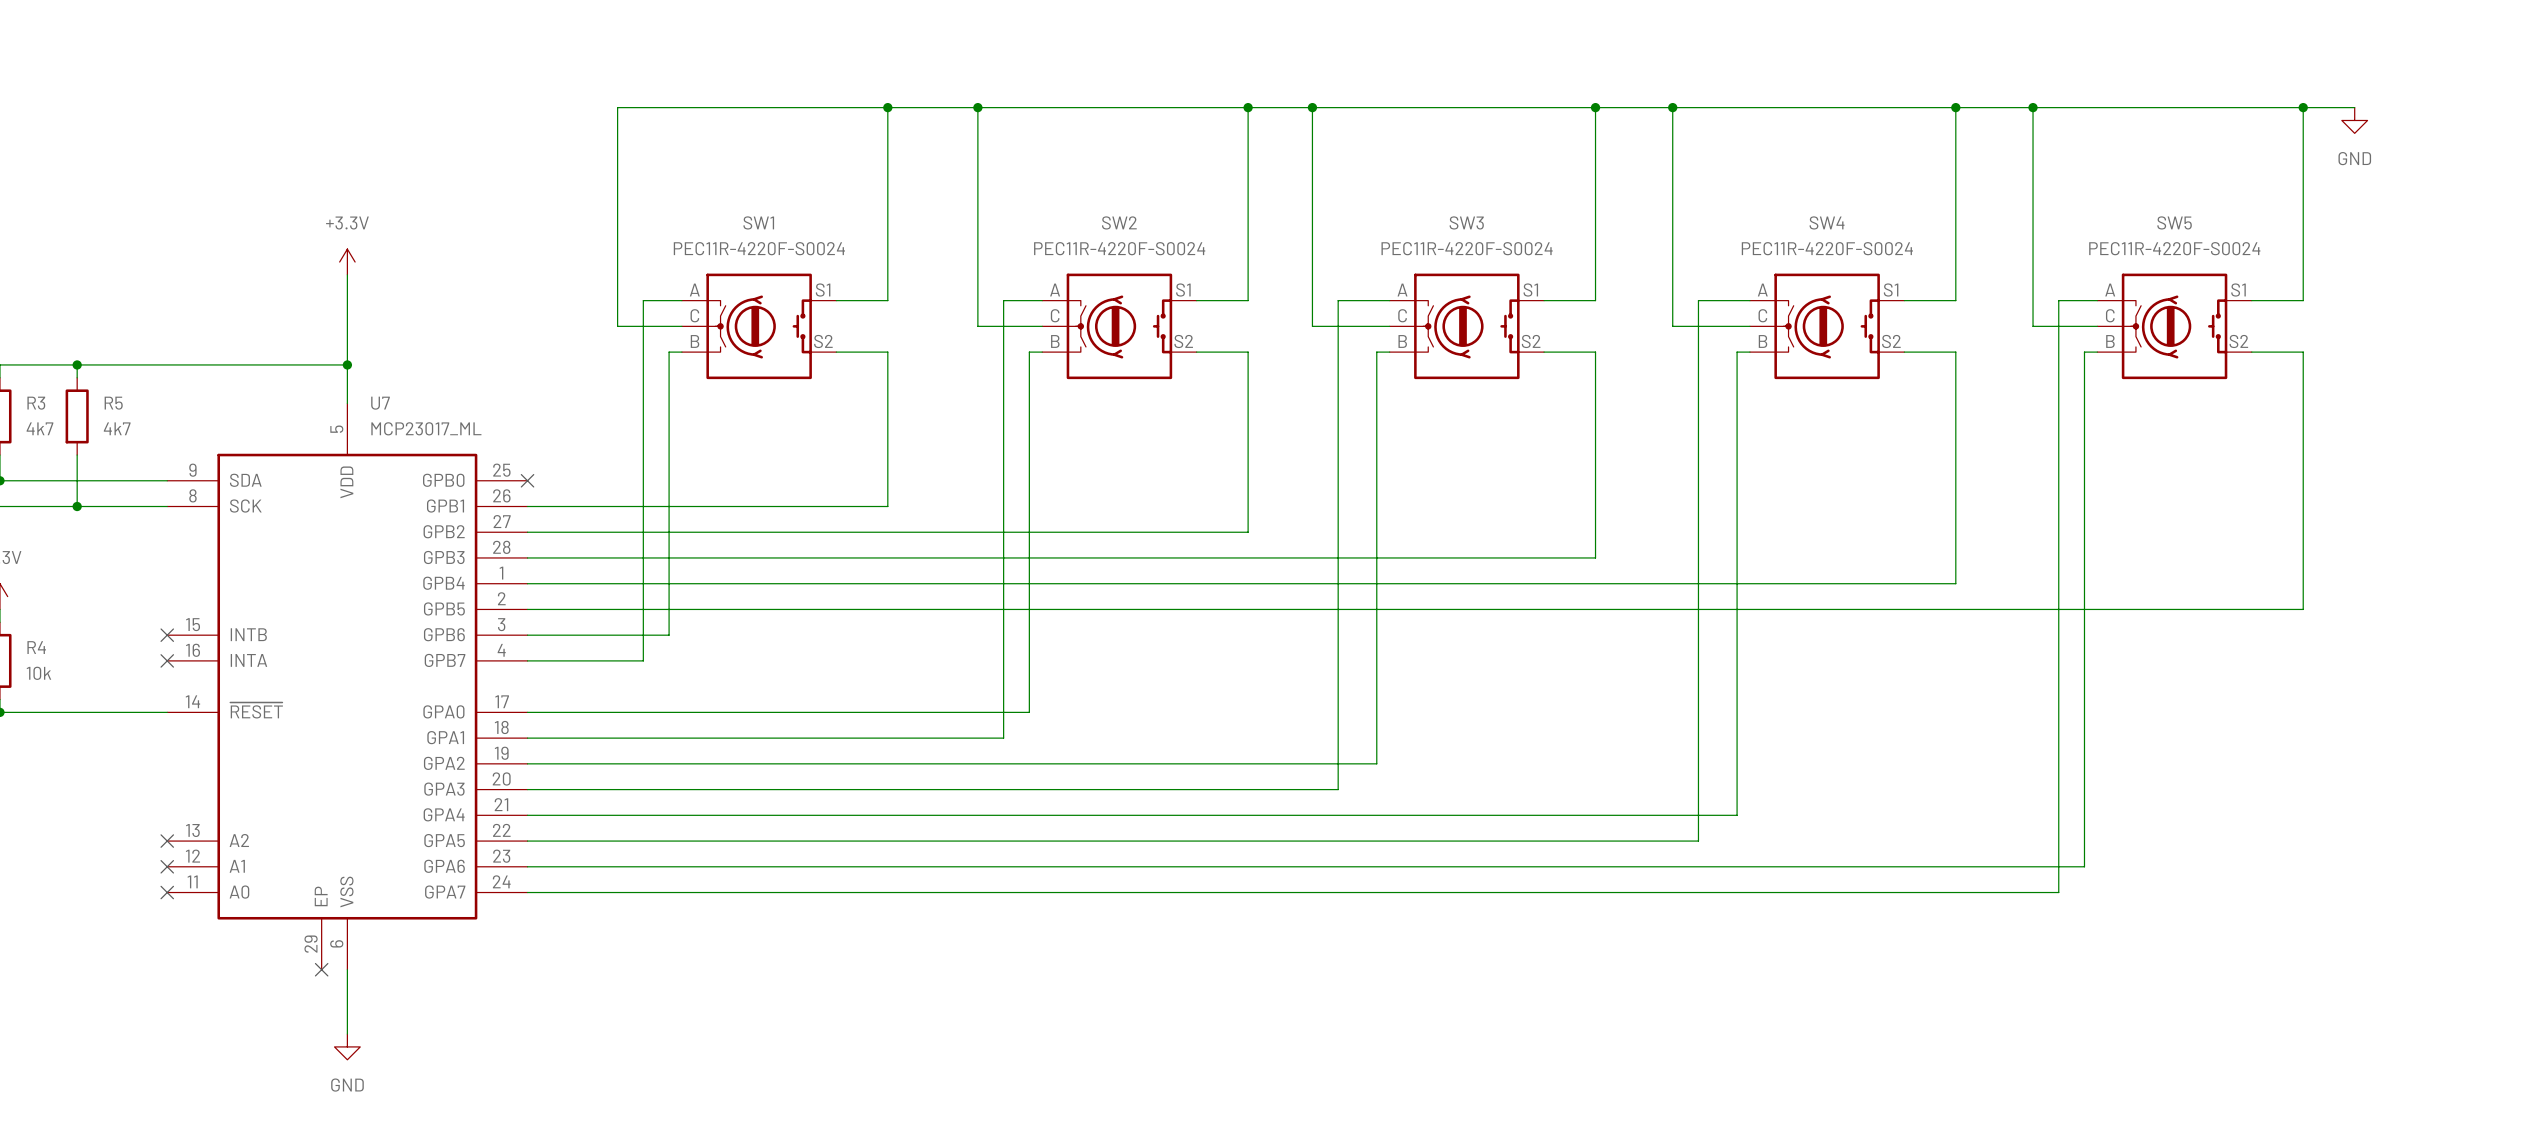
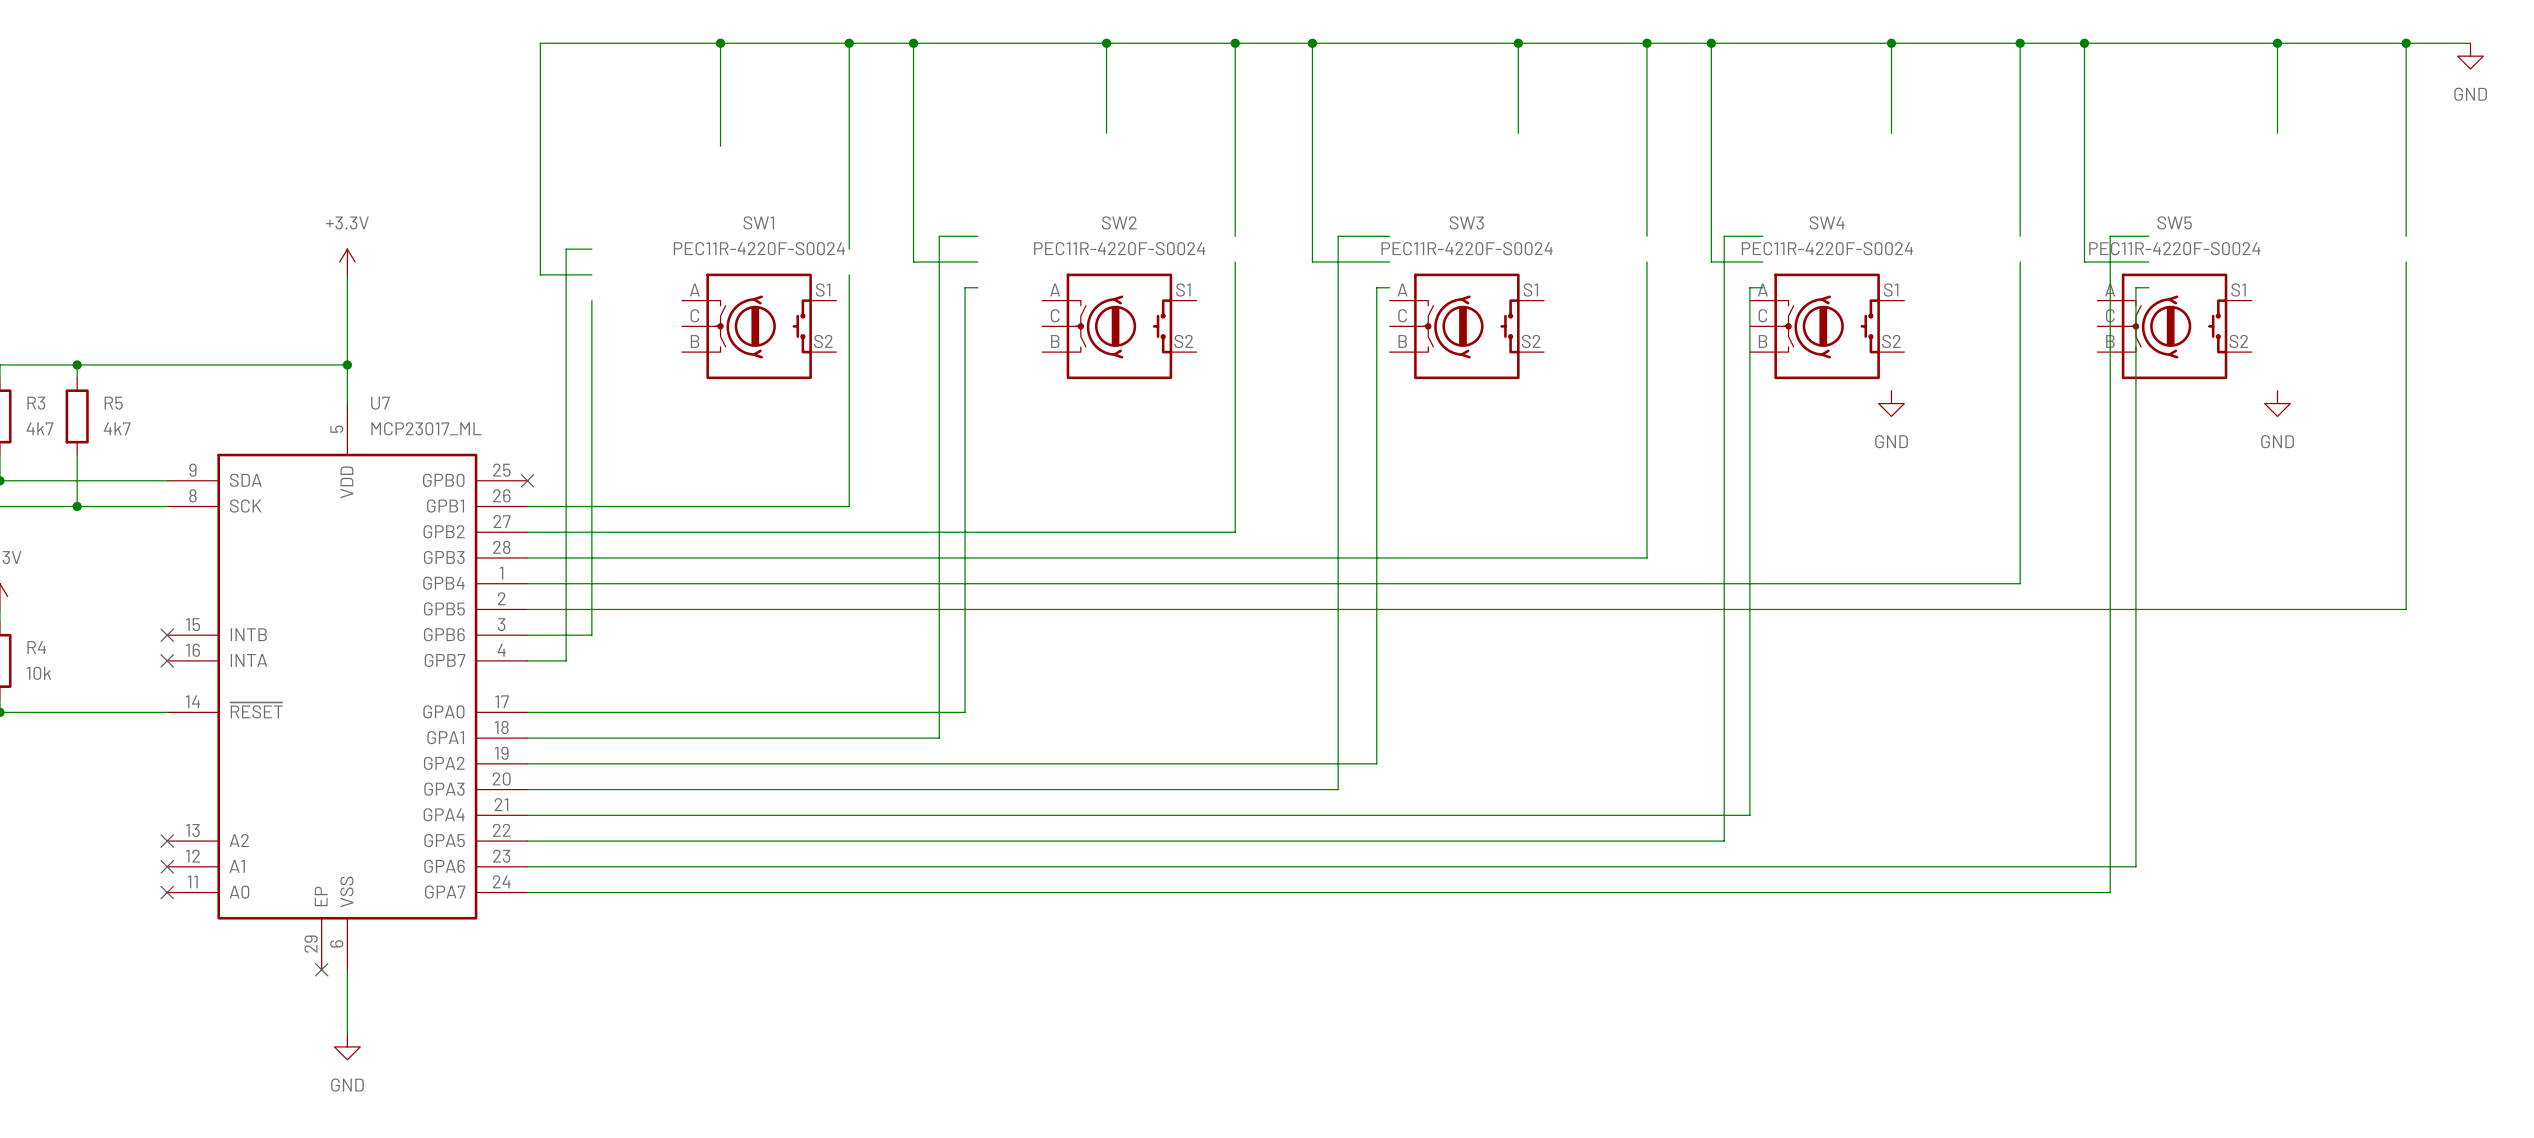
wire: none -> (720, 43) (720, 146)
junction: none -> (720, 43)
wire: none -> (849, 43) (849, 249)
junction: none -> (849, 43)
junction: none -> (913, 43)
wire: none -> (1106, 43) (1106, 133)
junction: none -> (1106, 43)
wire: none -> (1235, 43) (1235, 236)
junction: none -> (1235, 43)
wire: none -> (1312, 43) (1312, 107)
junction: none -> (1312, 43)
wire: none -> (1518, 43) (1518, 133)
junction: none -> (1518, 43)
wire: none -> (1646, 43) (1646, 236)
junction: none -> (1646, 43)
wire: none -> (1711, 43) (1711, 262) (1762, 262)
junction: none -> (1711, 43)
wire: none -> (1891, 43) (1891, 133)
junction: none -> (1891, 43)
wire: none -> (2020, 43) (2020, 236)
junction: none -> (2020, 43)
junction: none -> (2084, 43)
wire: none -> (2277, 43) (2277, 133)
junction: none -> (2277, 43)
wire: none -> (2406, 43) (2406, 236)
junction: none -> (2406, 43)
wire: none -> (2470, 43) (540, 43) (540, 274) (591, 274)
wire: (887, 107) (887, 300) (836, 300) -> none
junction: (887, 107) -> none
wire: (977, 107) (977, 326) (1042, 326) -> (913, 43) (913, 262) (977, 262)
junction: (977, 107) -> none
wire: (1248, 107) (1248, 300) (1196, 300) -> none
junction: (1248, 107) -> none
junction: (1312, 107) -> none
wire: (1595, 107) (1595, 300) (1544, 300) -> none
junction: (1595, 107) -> none
wire: (1672, 107) (1672, 326) (1749, 326) -> none
junction: (1672, 107) -> none
wire: (1955, 107) (1955, 300) (1904, 300) -> none
junction: (1955, 107) -> none
wire: (2033, 107) (2033, 326) (2097, 326) -> (2084, 43) (2084, 262) (2148, 262)
junction: (2033, 107) -> none
wire: (2303, 107) (2303, 300) (2251, 300) -> none
junction: (2303, 107) -> none
wire: (2354, 107) (617, 107) (617, 326) (681, 326) -> none
power symbol position: GND (2354, 120) -> GND (2470, 56)
wire: (1312, 262) (1312, 326) (1389, 326) -> (1312, 262) (1389, 262)
wire: (681, 300) (643, 300) (643, 660) (566, 660) -> (591, 249) (566, 249) (566, 660)
wire: (1042, 300) (1003, 300) (1003, 738) (939, 738) -> (977, 236) (939, 236) (939, 738)
wire: (1338, 300) (1389, 300) -> (1338, 300) (1338, 236) (1389, 236)
wire: (1749, 300) (1698, 300) (1698, 841) -> (1762, 236) (1724, 236) (1724, 841) (1698, 841)
wire: (2097, 300) (2058, 300) (2058, 892) -> (2148, 236) (2110, 236) (2110, 892) (2058, 892)
wire: (681, 352) (669, 352) (669, 635) (591, 635) -> (591, 300) (591, 635)
wire: (836, 352) (887, 352) (887, 506) (849, 506) -> (849, 274) (849, 506)
wire: (1042, 352) (1029, 352) (1029, 712) (965, 712) -> (977, 287) (965, 287) (965, 712)
wire: (1196, 352) (1248, 352) (1248, 532) (1235, 532) -> (1235, 262) (1235, 532)
wire: (1376, 352) (1389, 352) -> (1376, 352) (1376, 287) (1389, 287)
wire: (1544, 352) (1595, 352) (1595, 557) -> (1646, 262) (1646, 557) (1595, 557)
wire: (1749, 352) (1737, 352) (1737, 815) -> (1762, 287) (1749, 287) (1749, 815) (1737, 815)
wire: (1904, 352) (1955, 352) (1955, 583) -> (2020, 262) (2020, 583) (1955, 583)
wire: (2097, 352) (2084, 352) (2084, 866) -> (2148, 287) (2135, 287) (2135, 866) (2084, 866)
wire: (2251, 352) (2303, 352) (2303, 609) -> (2406, 262) (2406, 609) (2303, 609)
power symbol: none -> GND (1891, 403)
power symbol: none -> GND (2277, 403)

